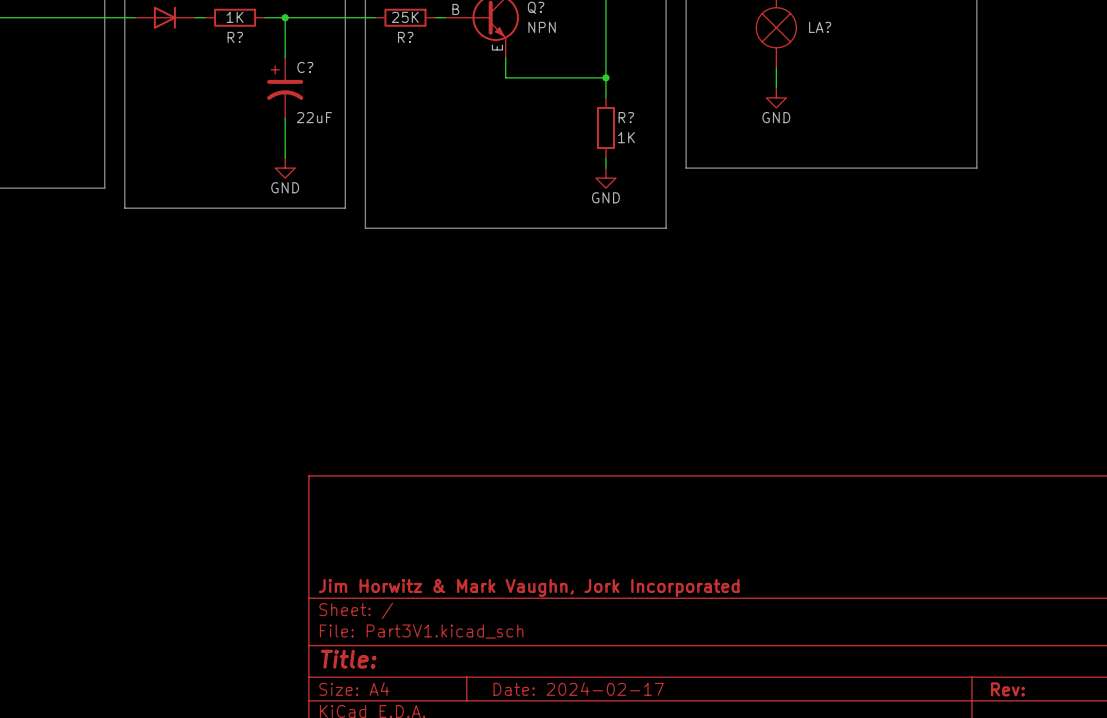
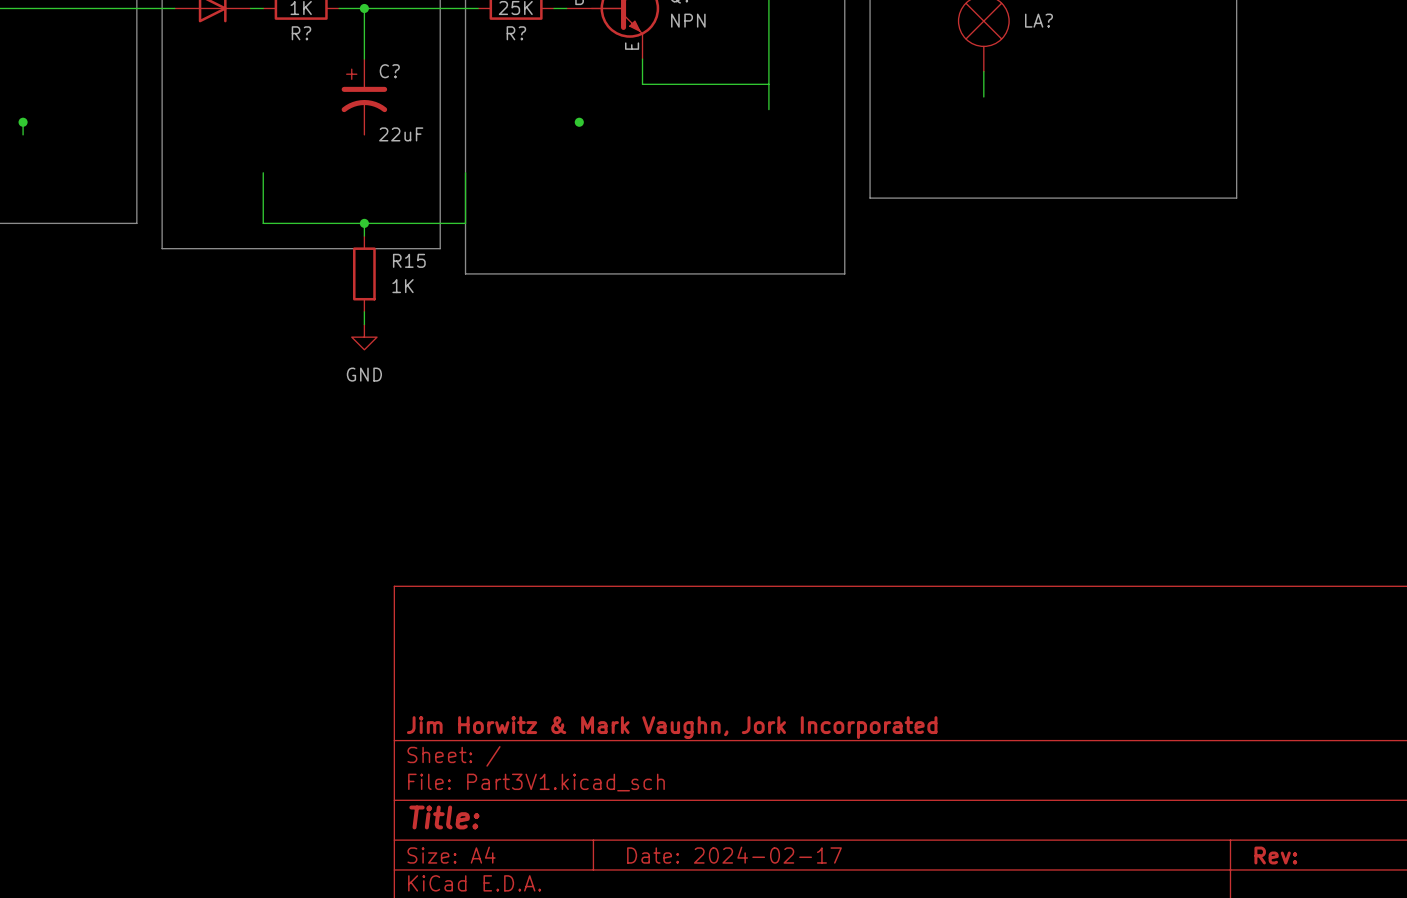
junction: (605, 77) -> none
power symbol: GND (776, 97) -> none
wire: none -> (23, 122) (23, 134)
junction: none -> (23, 122)
junction: none -> (579, 122)
wire: (285, 117) (285, 158) -> none
R?: 1K (605, 128) -> none
wire: none -> (263, 172) (263, 223) (465, 223) (465, 172)
wire: (605, 158) (605, 168) -> none
power symbol position: GND (285, 168) -> GND (364, 337)
power symbol: GND (605, 178) -> none
power symbol text position: GND (285, 187) -> GND (364, 374)
wire: none -> (364, 223) (364, 236)
junction: none -> (364, 223)
R15: none -> 1K (364, 273)
wire: none -> (364, 311) (364, 324)

